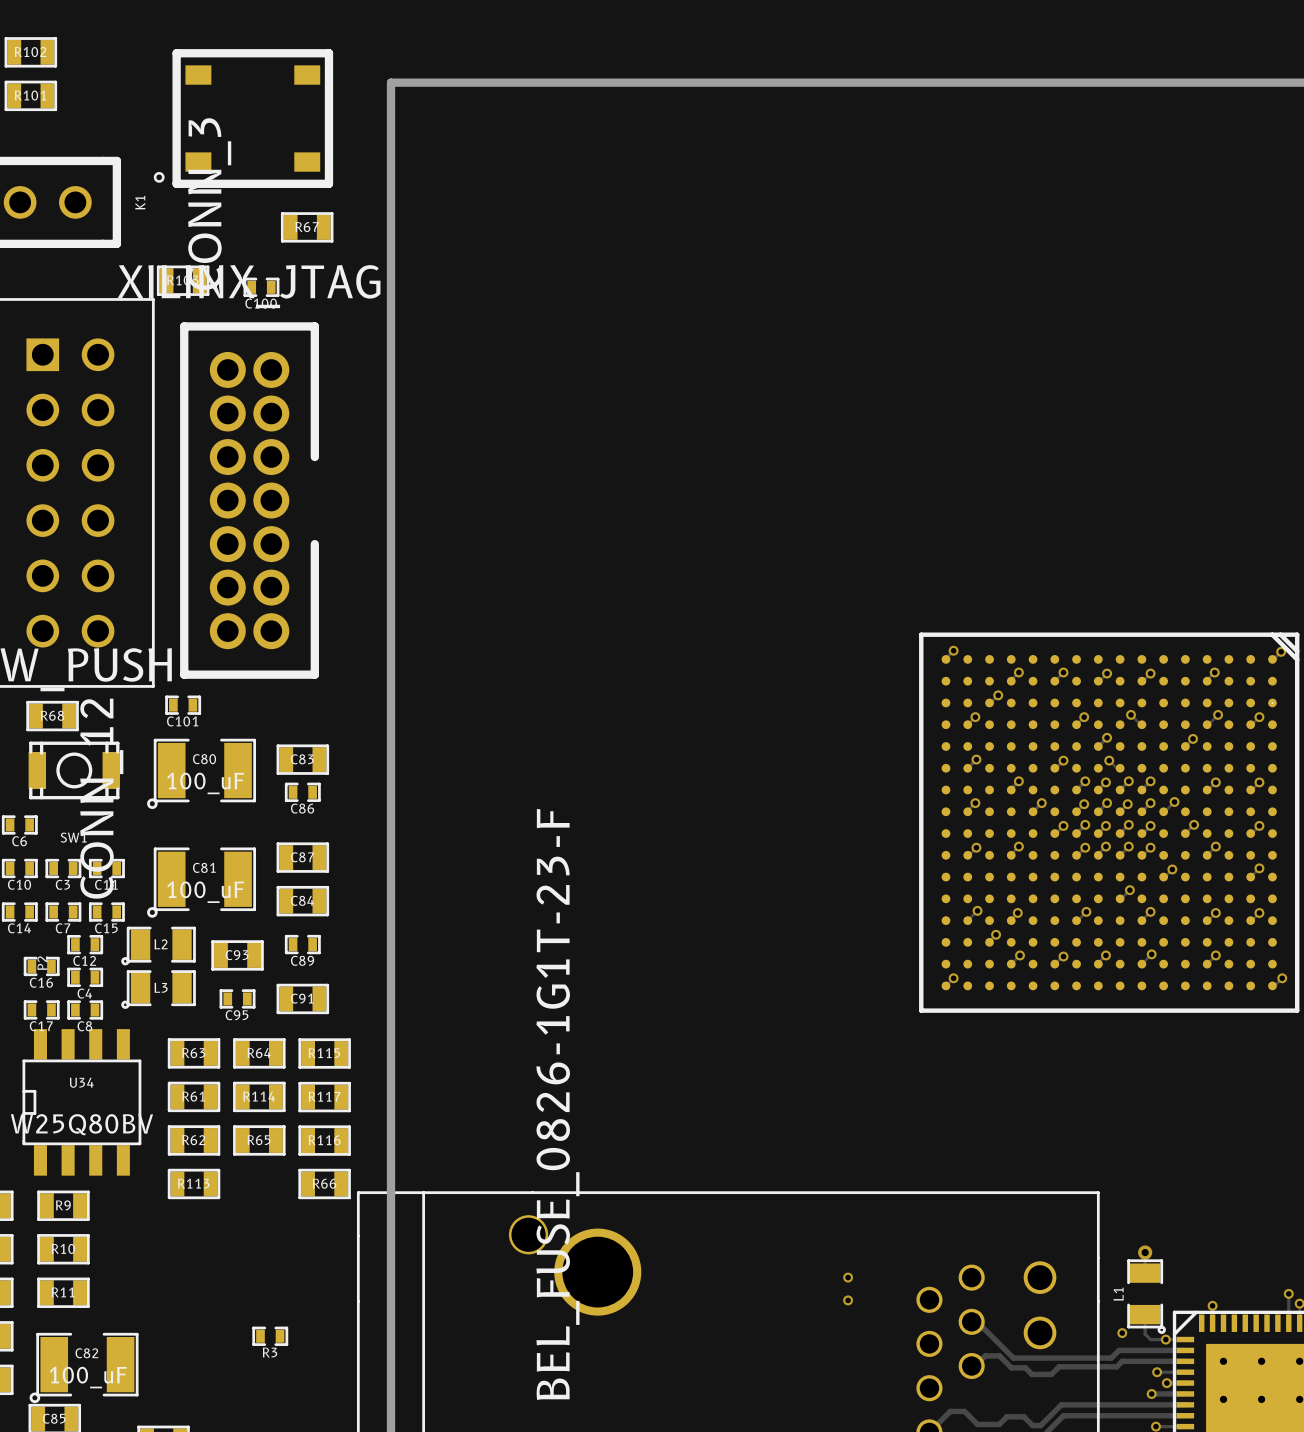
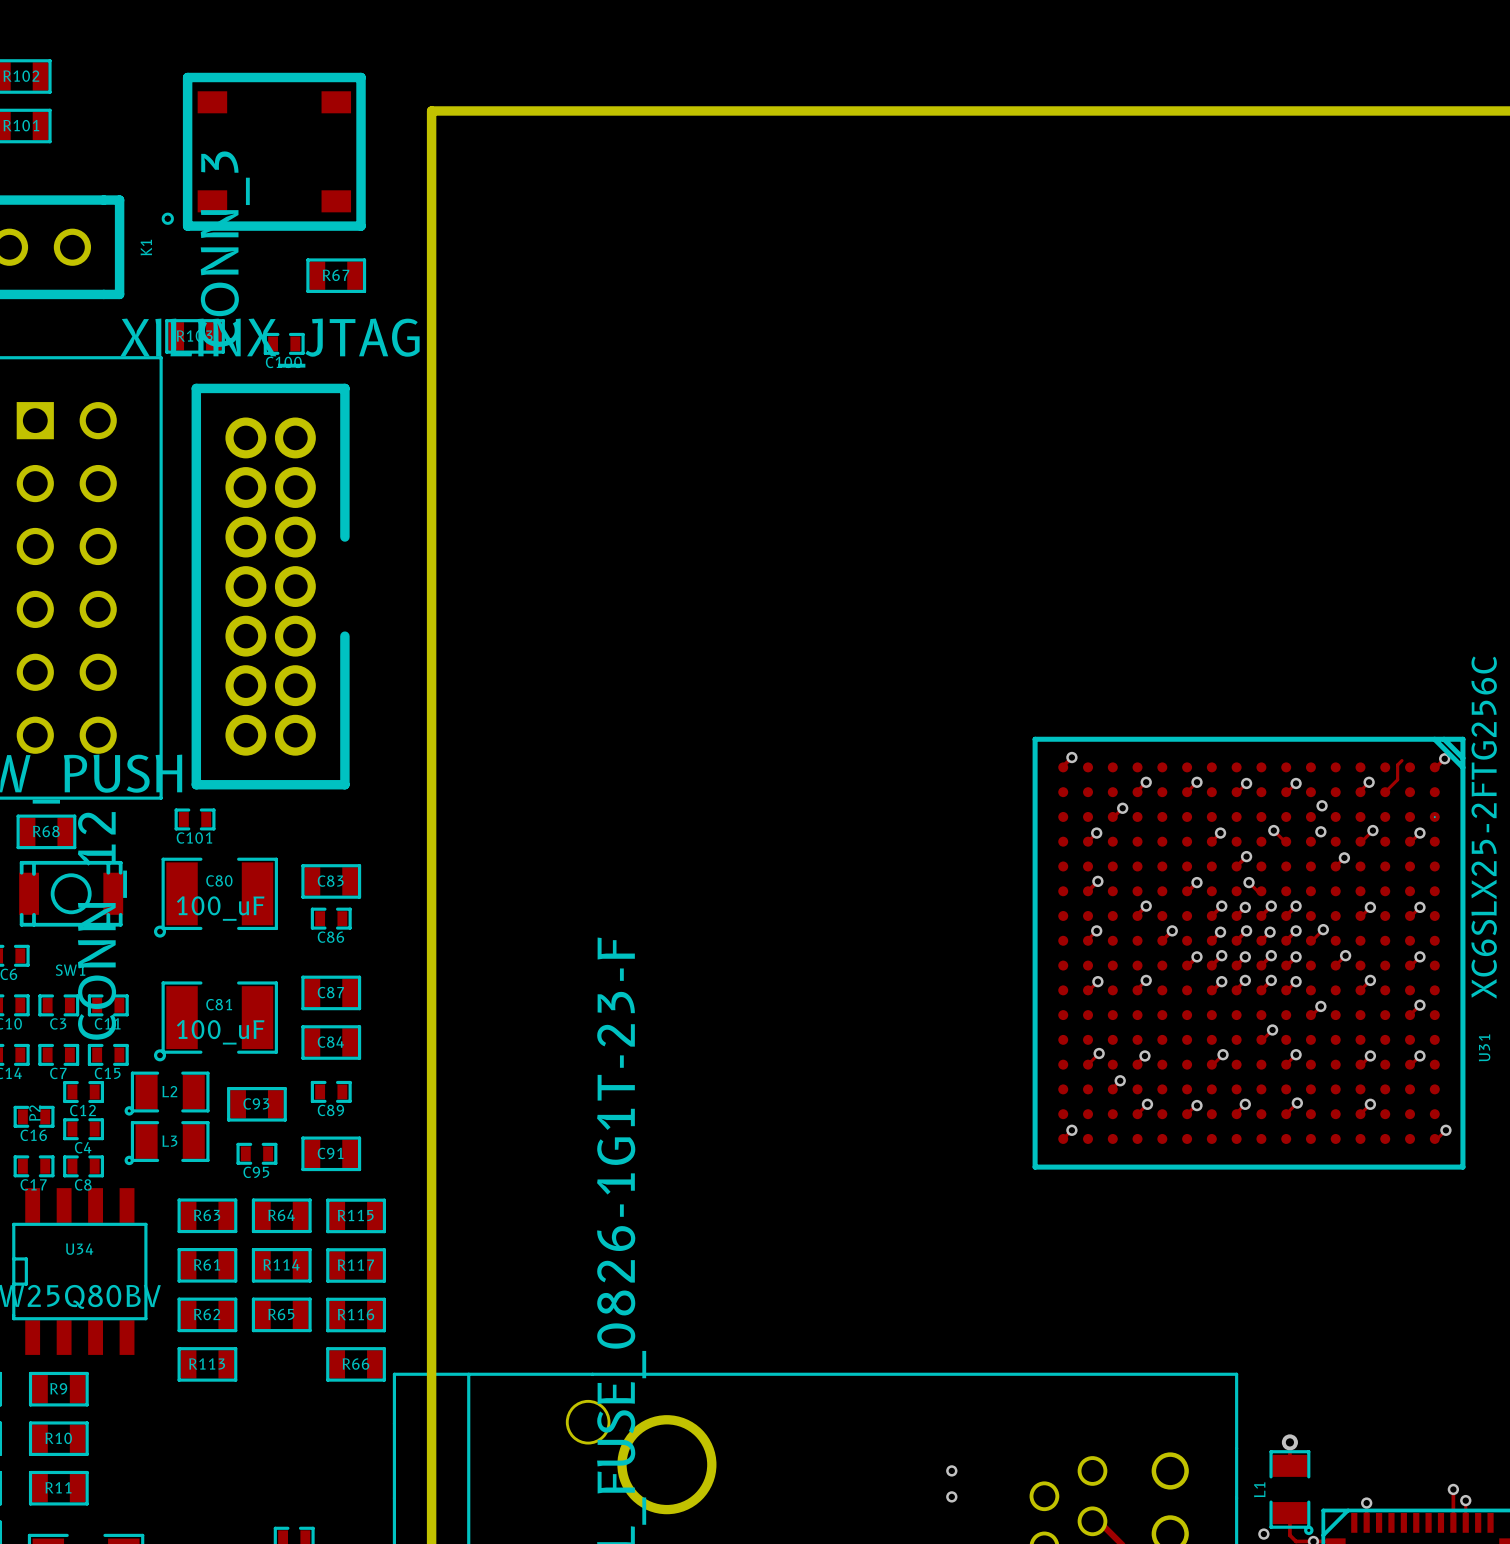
track: none -> (1401, 760) (1397, 764) (1397, 779) (1385, 792)
via: none -> (1322, 805)
via: none -> (1320, 831)

